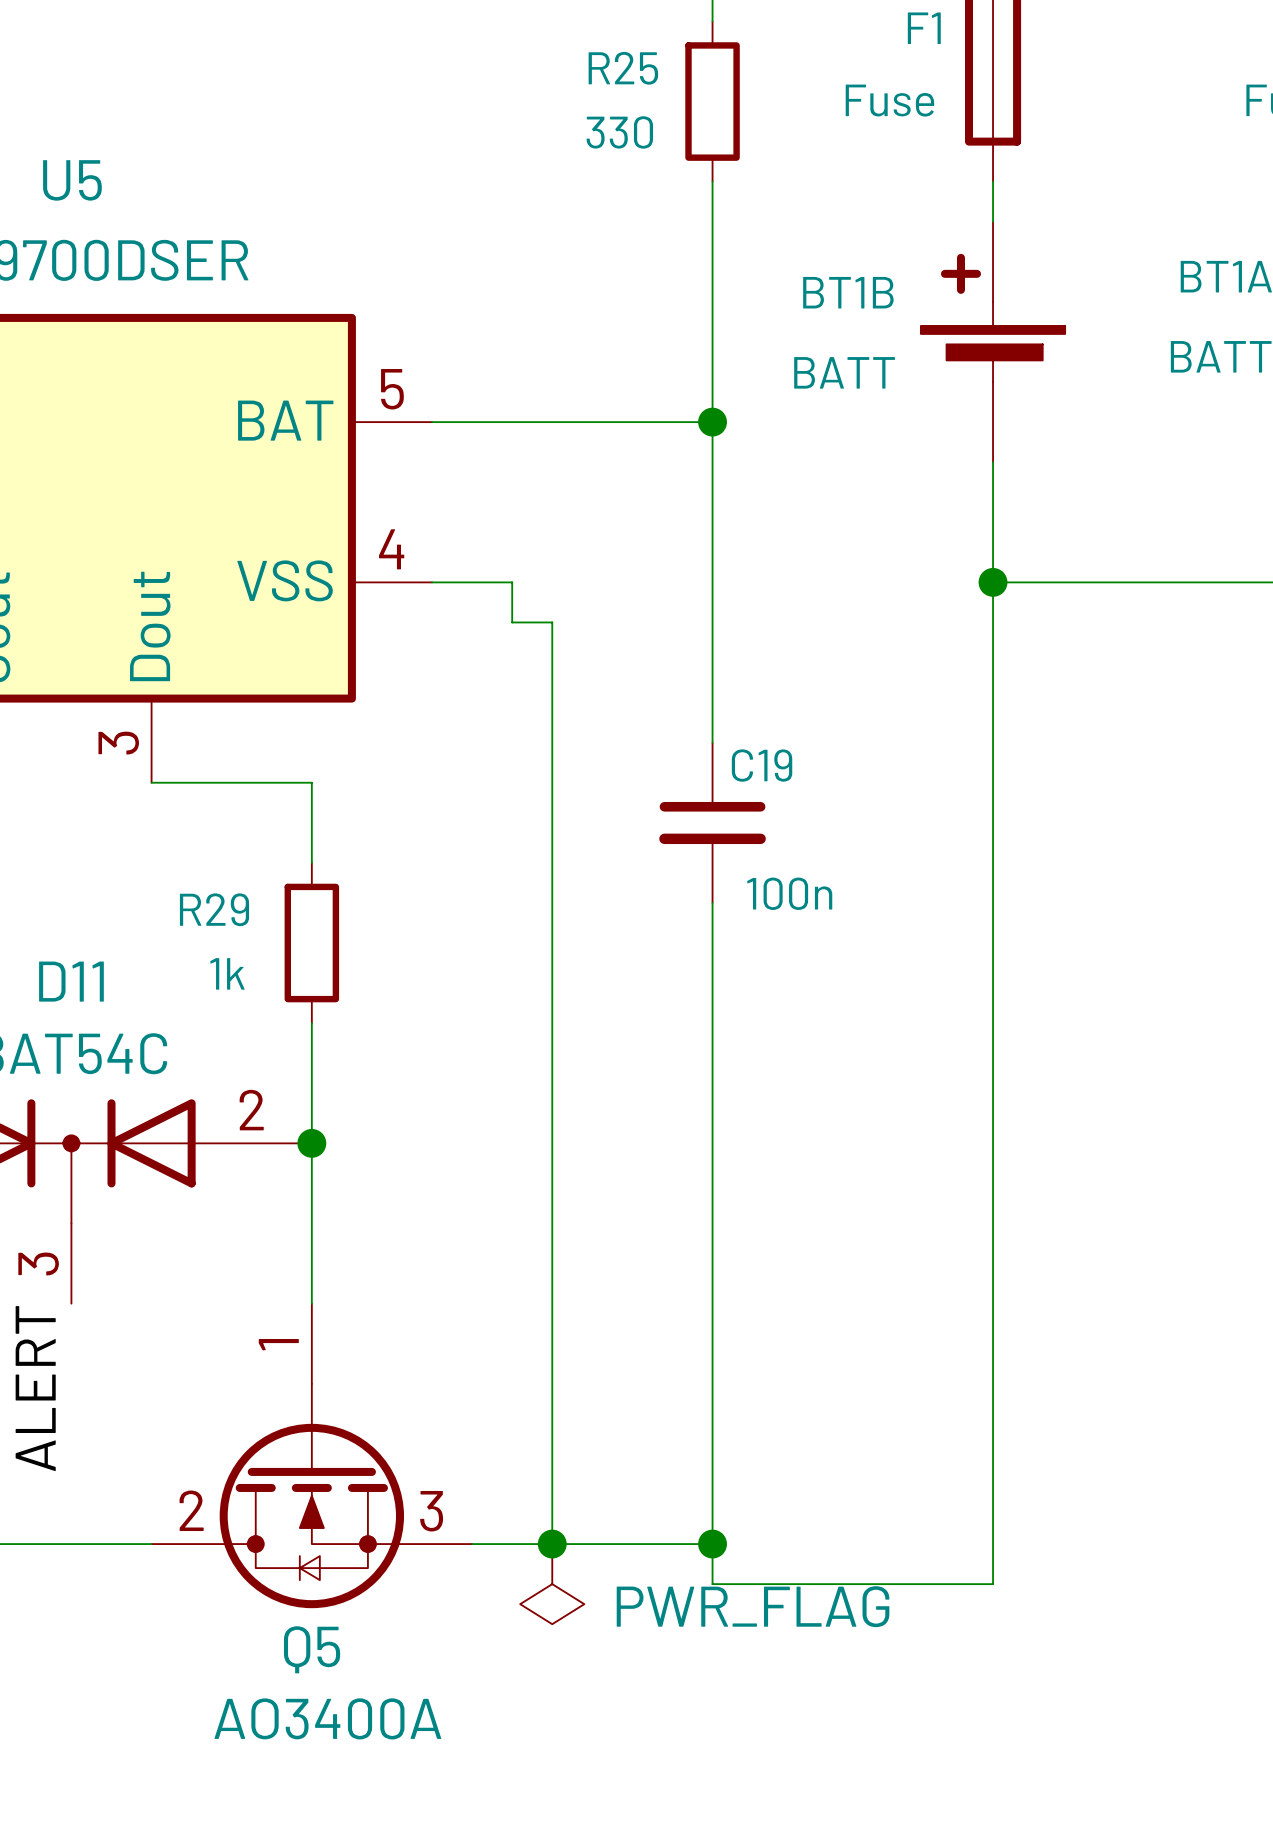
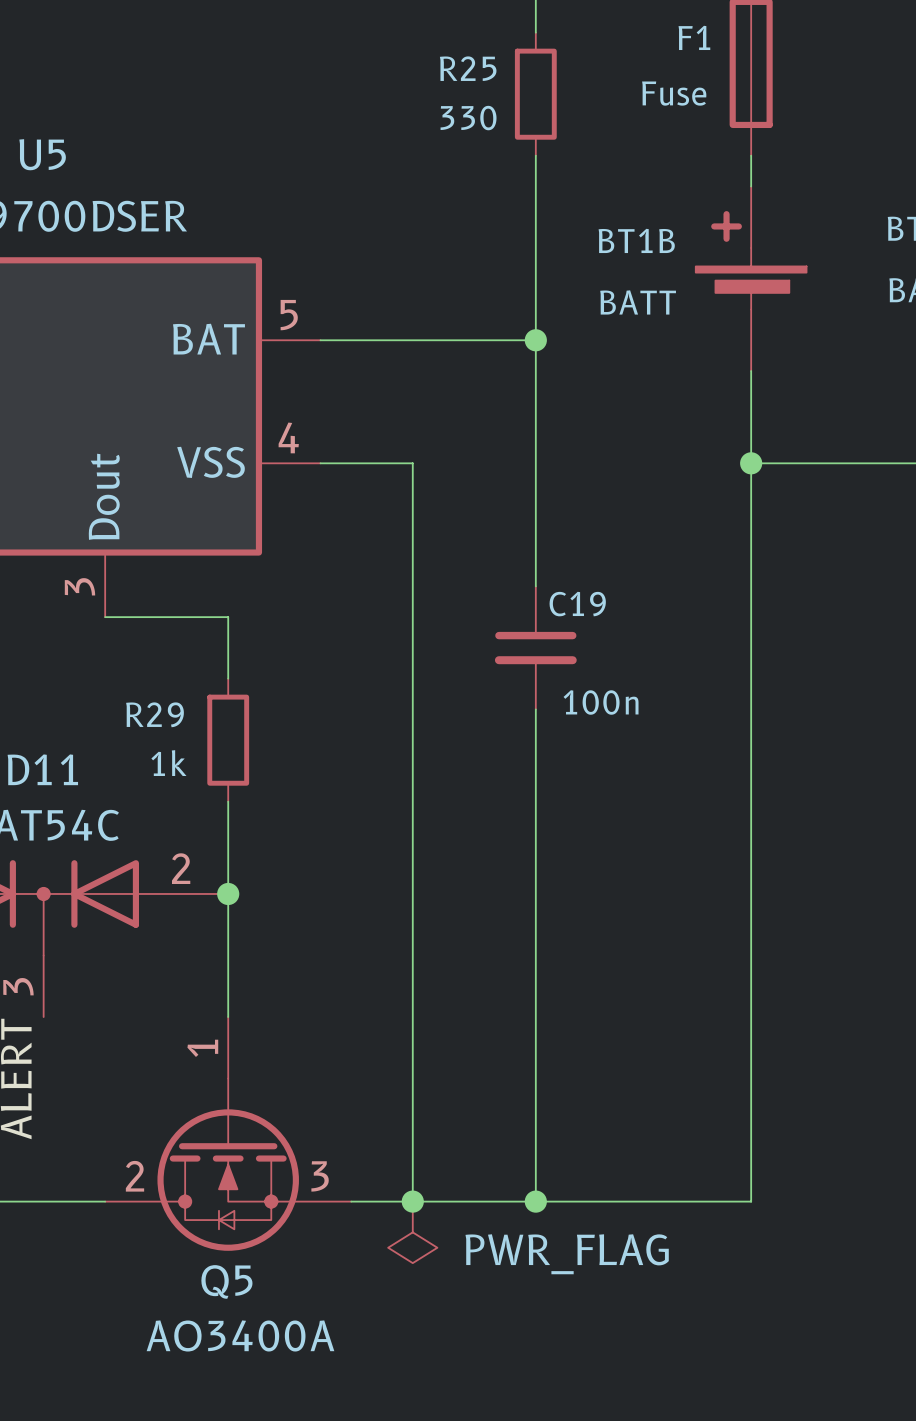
wire: (512, 582) (512, 622) (552, 622) -> (382, 463) (412, 463) (412, 494)
wire: (712, 1544) (712, 1584) (993, 1584) (993, 1544) -> (535, 1201) (751, 1201)

